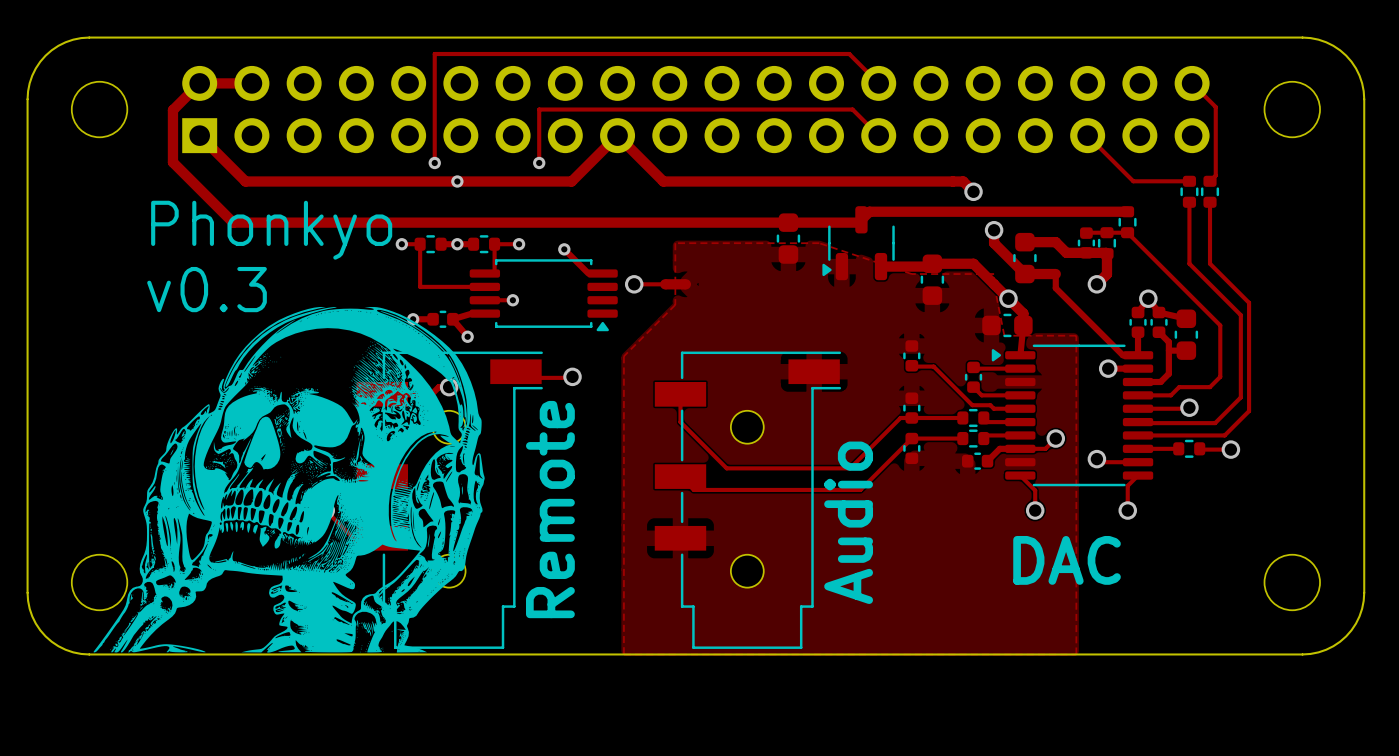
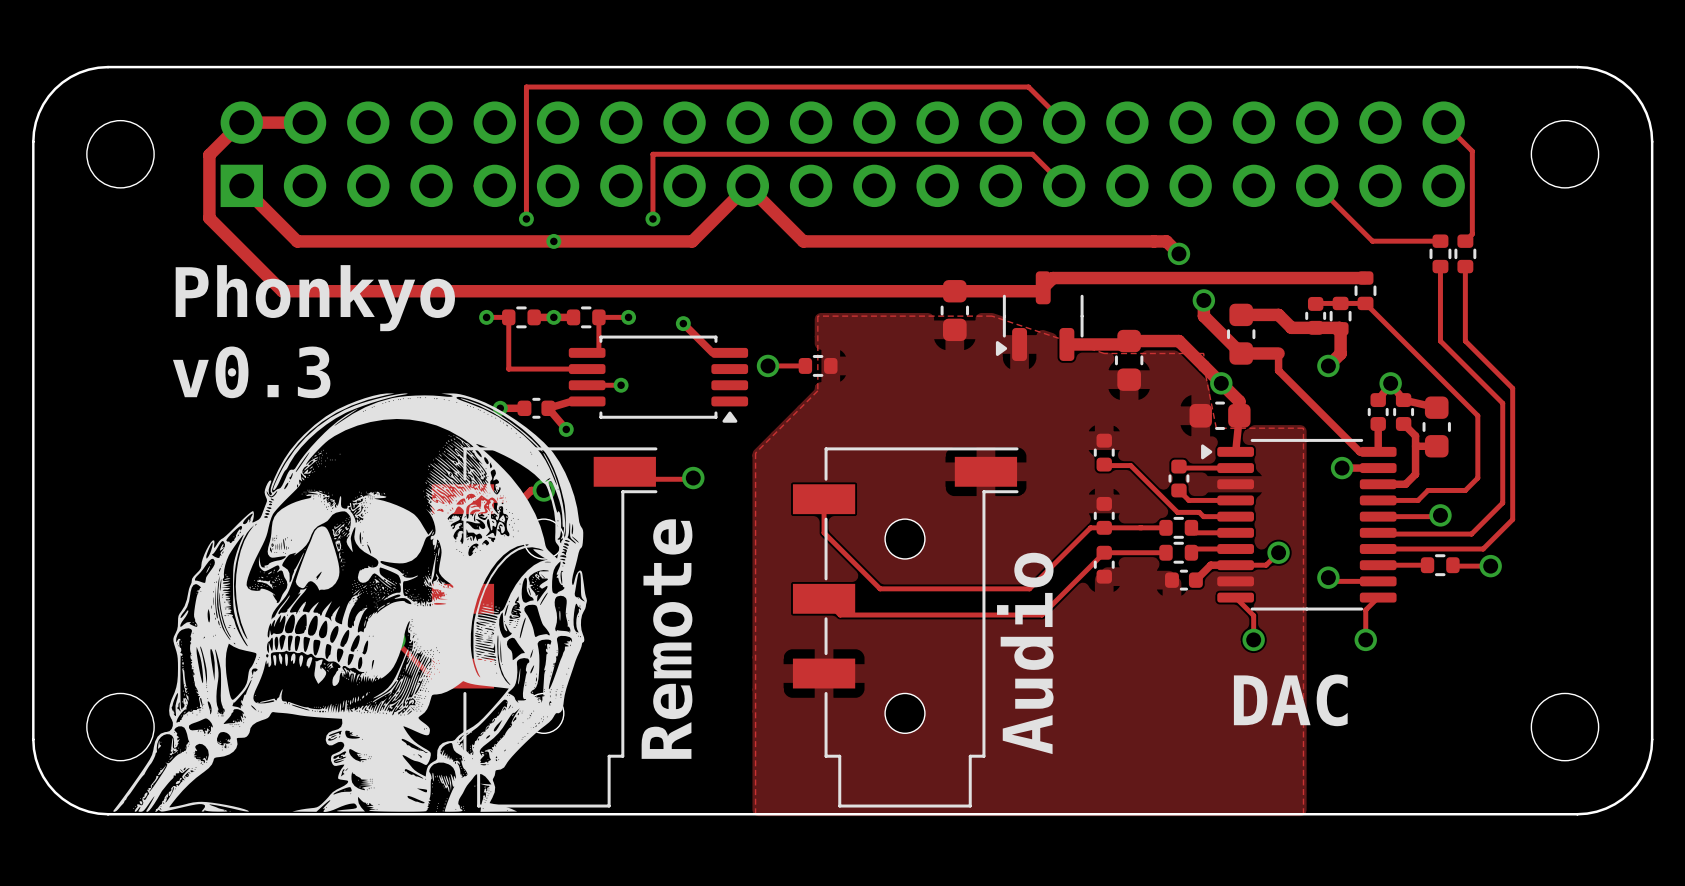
part footprint: [660, 279, 691, 290] -> [798, 354, 838, 377]

